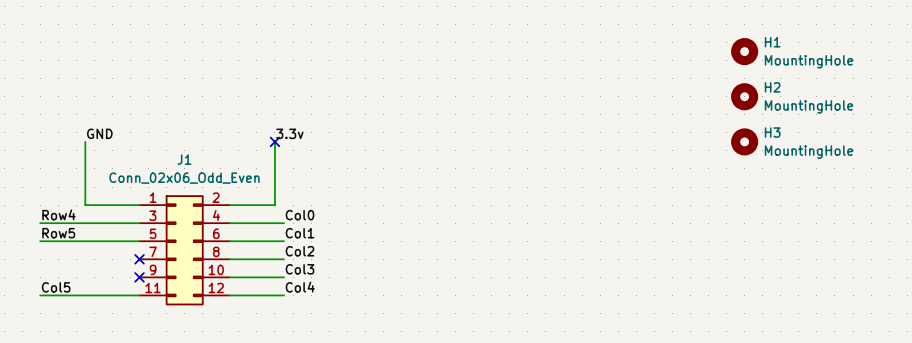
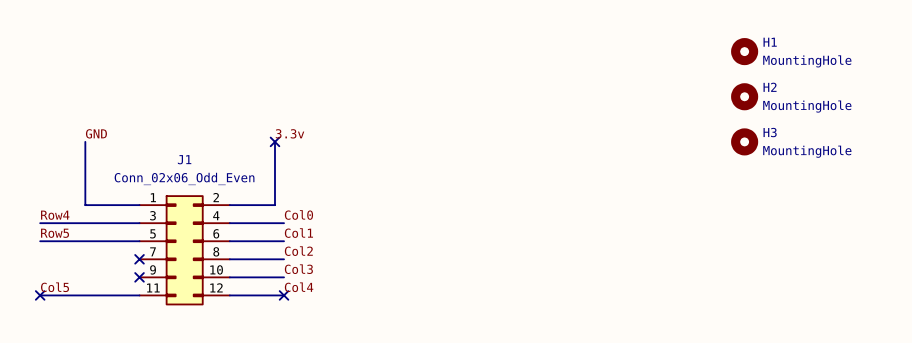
no-connect mark: none -> (40, 295)
no-connect mark: none -> (284, 295)

